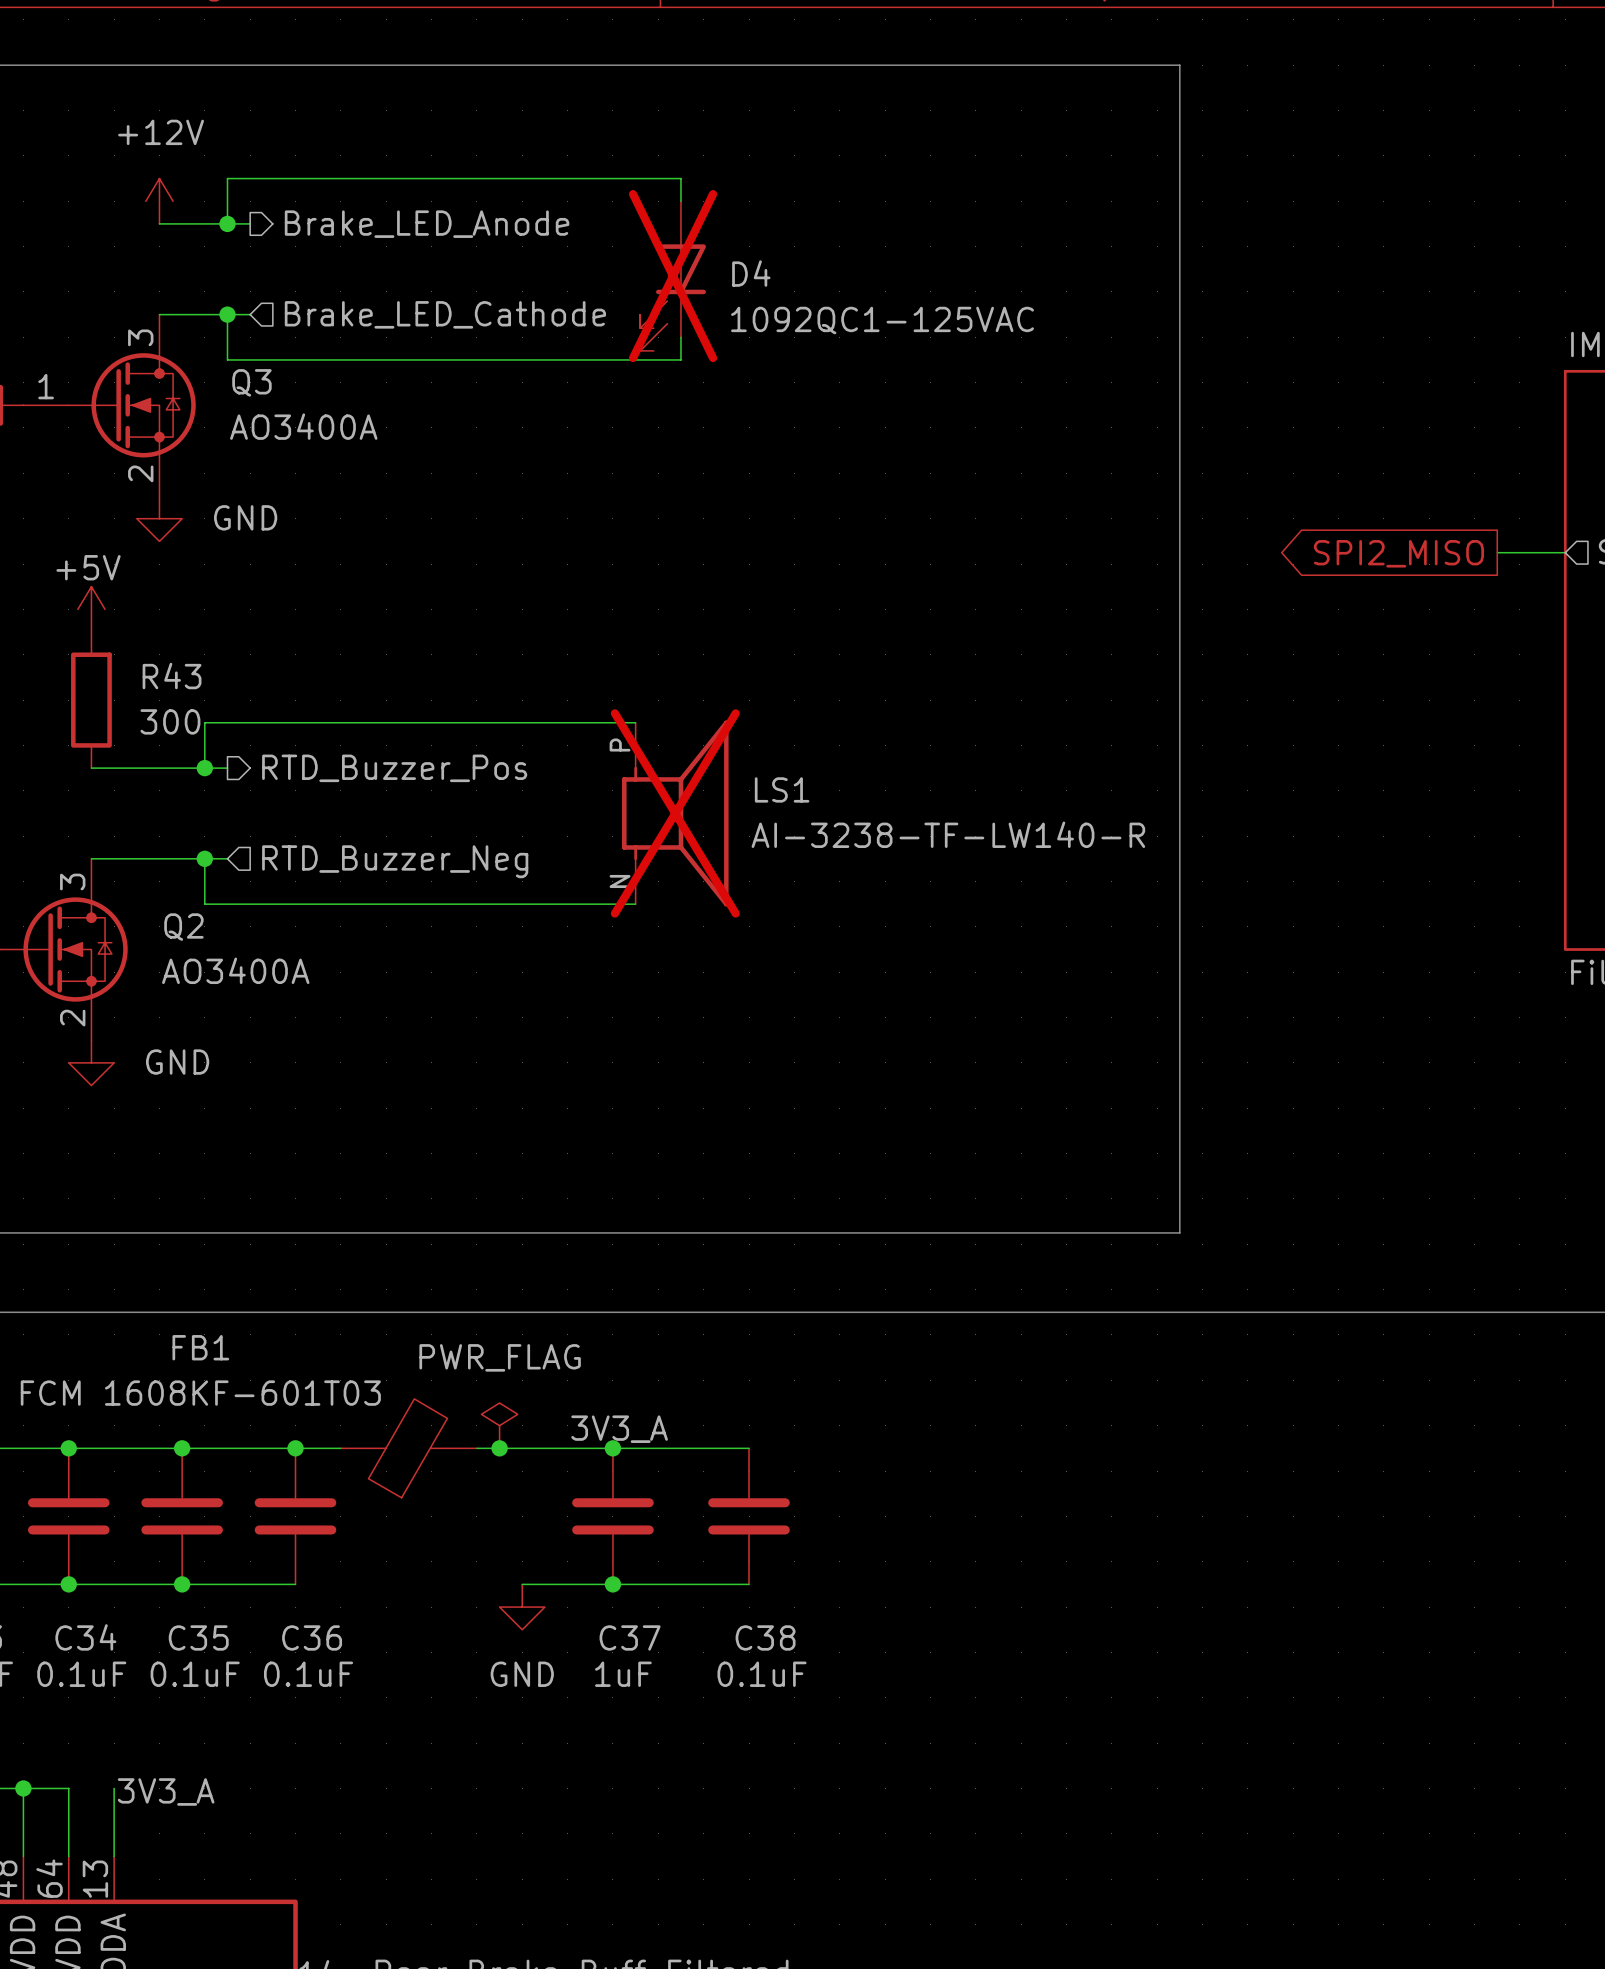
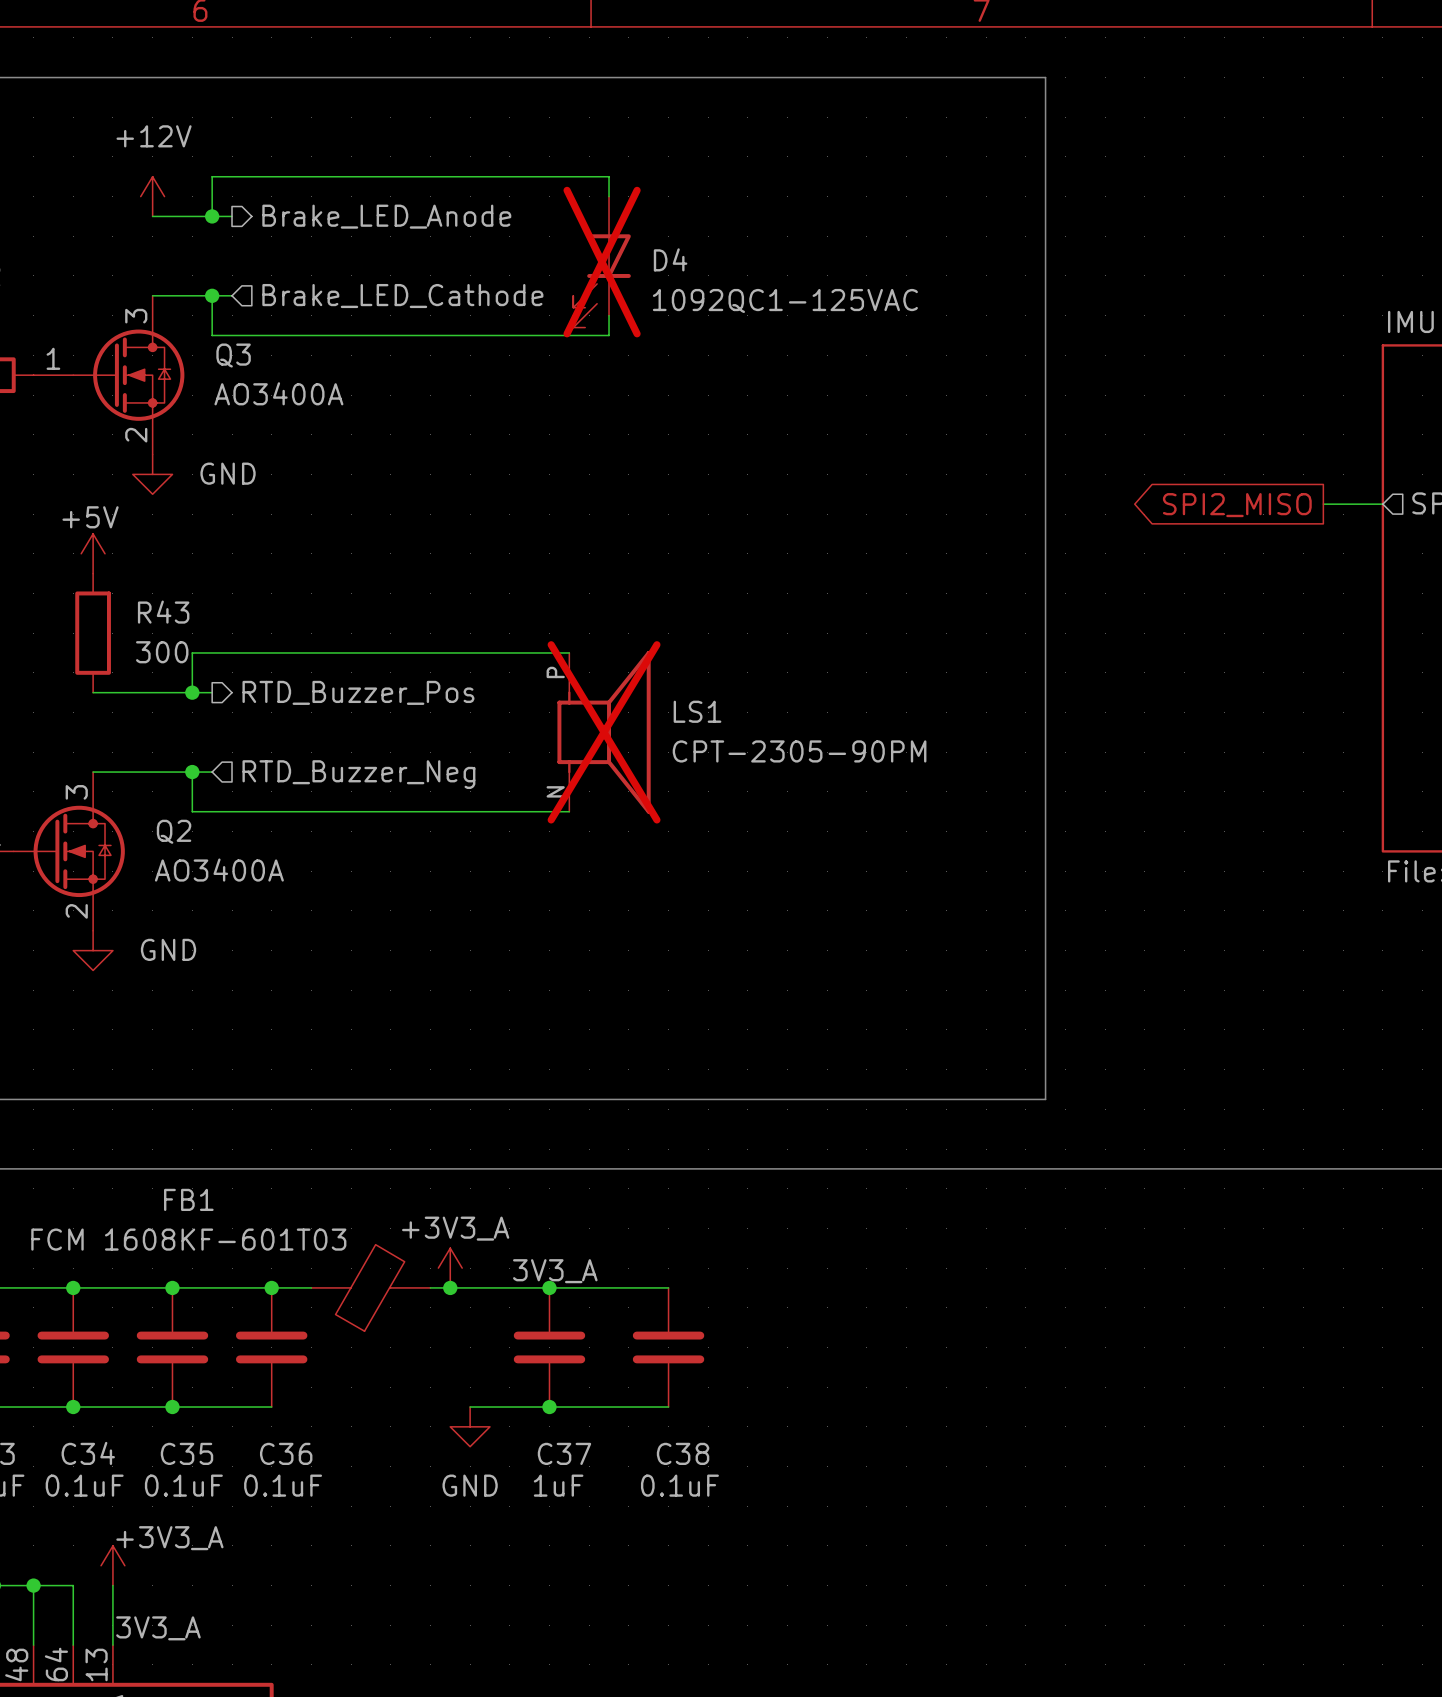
LS1 value: AI-3238-TF-LW140-R (948, 834) -> CPT-2305-90PM (799, 751)
power symbol: PWR_FLAG (499, 1425) -> +3V3_A (450, 1268)
power symbol: none -> +3V3_A (112, 1565)
label position: 3V3_A (166, 1791) -> 3V3_A (158, 1628)

